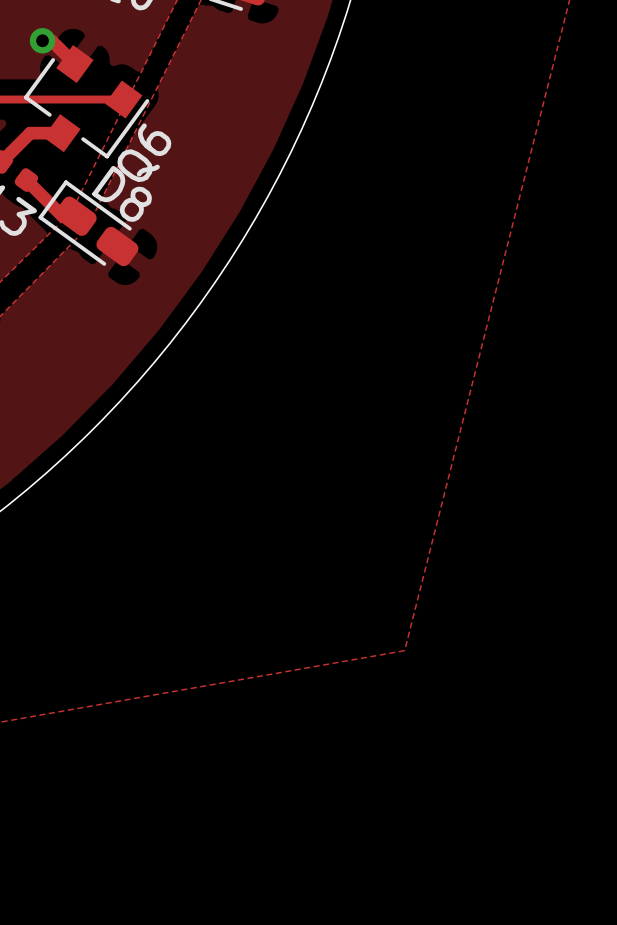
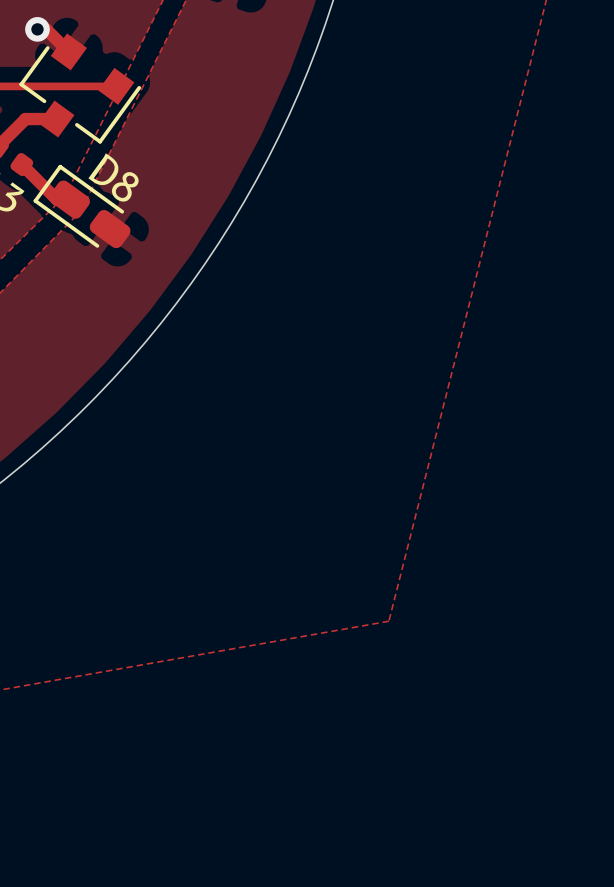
Q6 name: Q6 (144, 152) -> none

